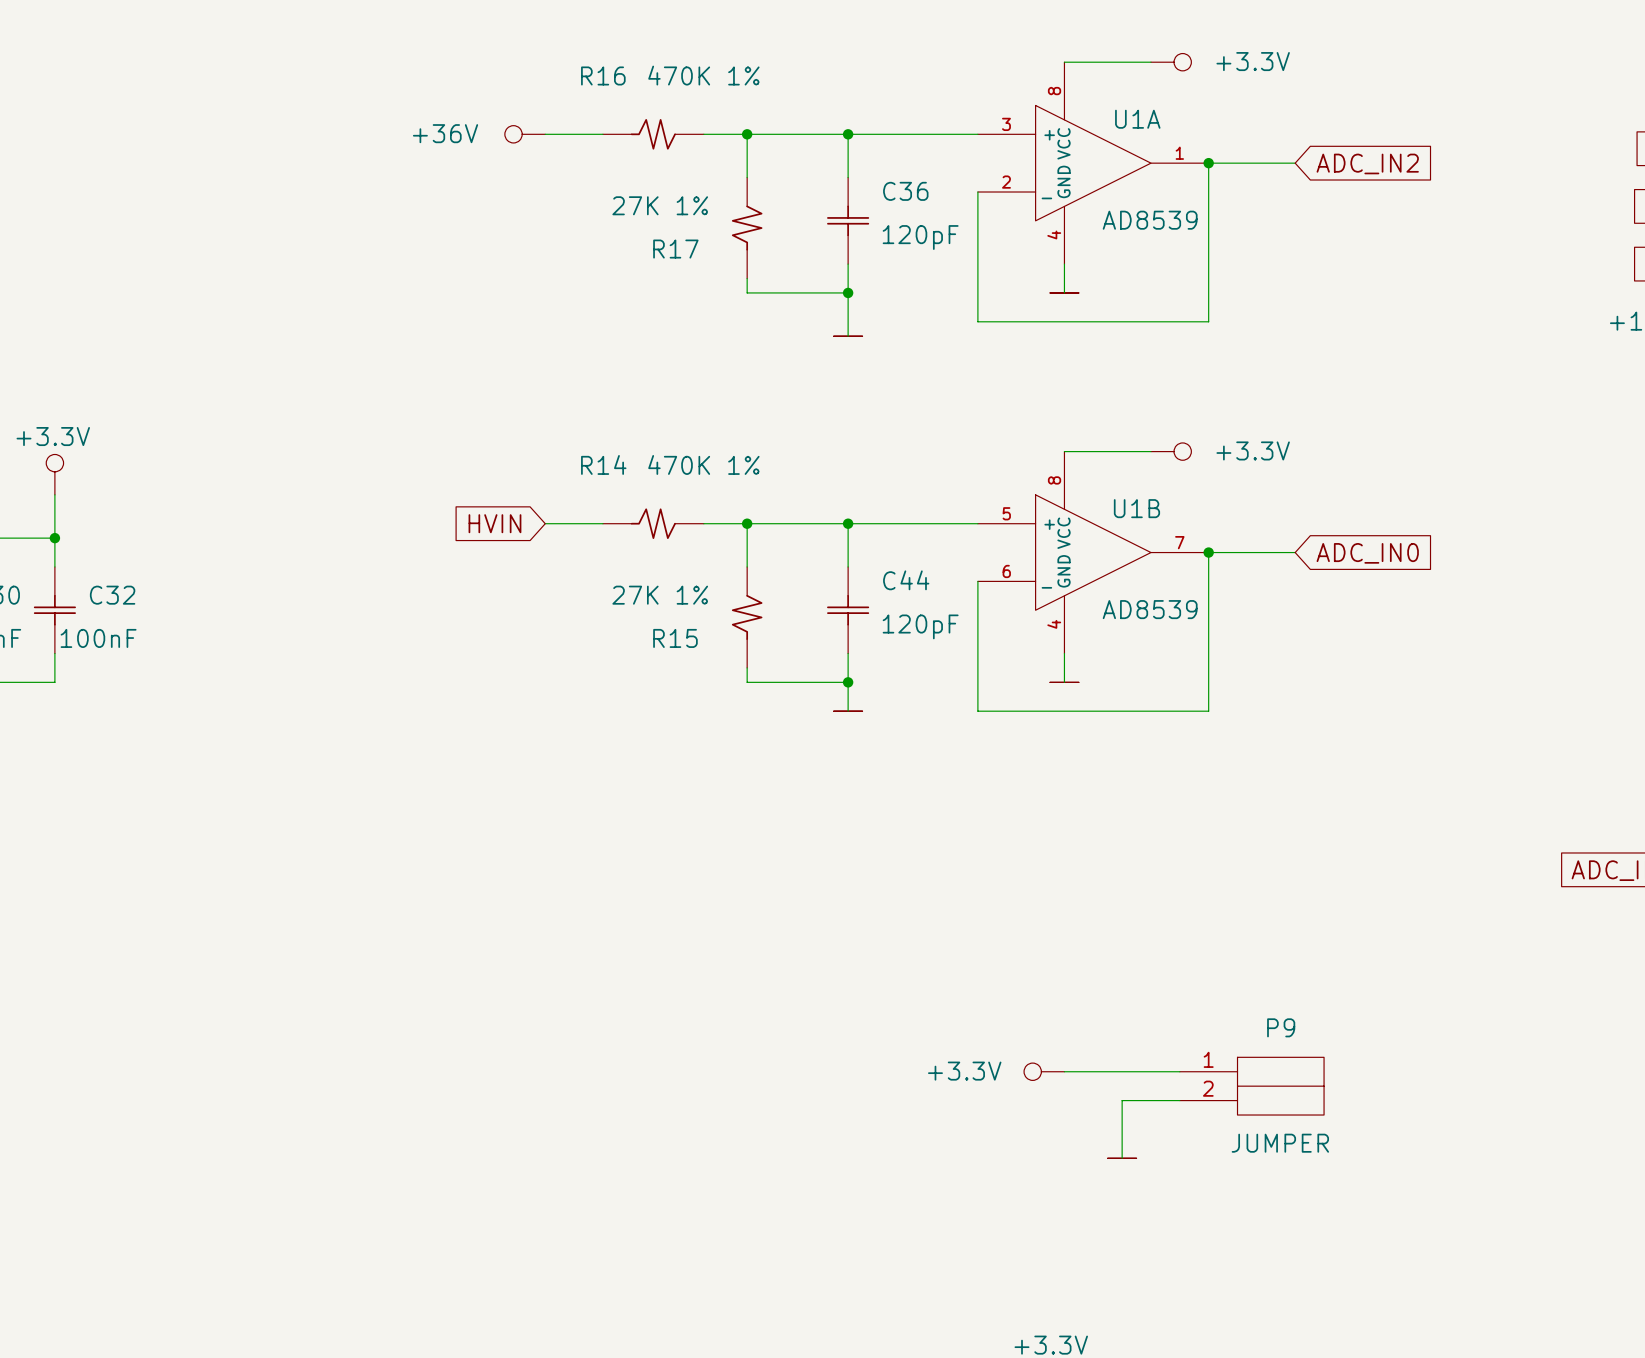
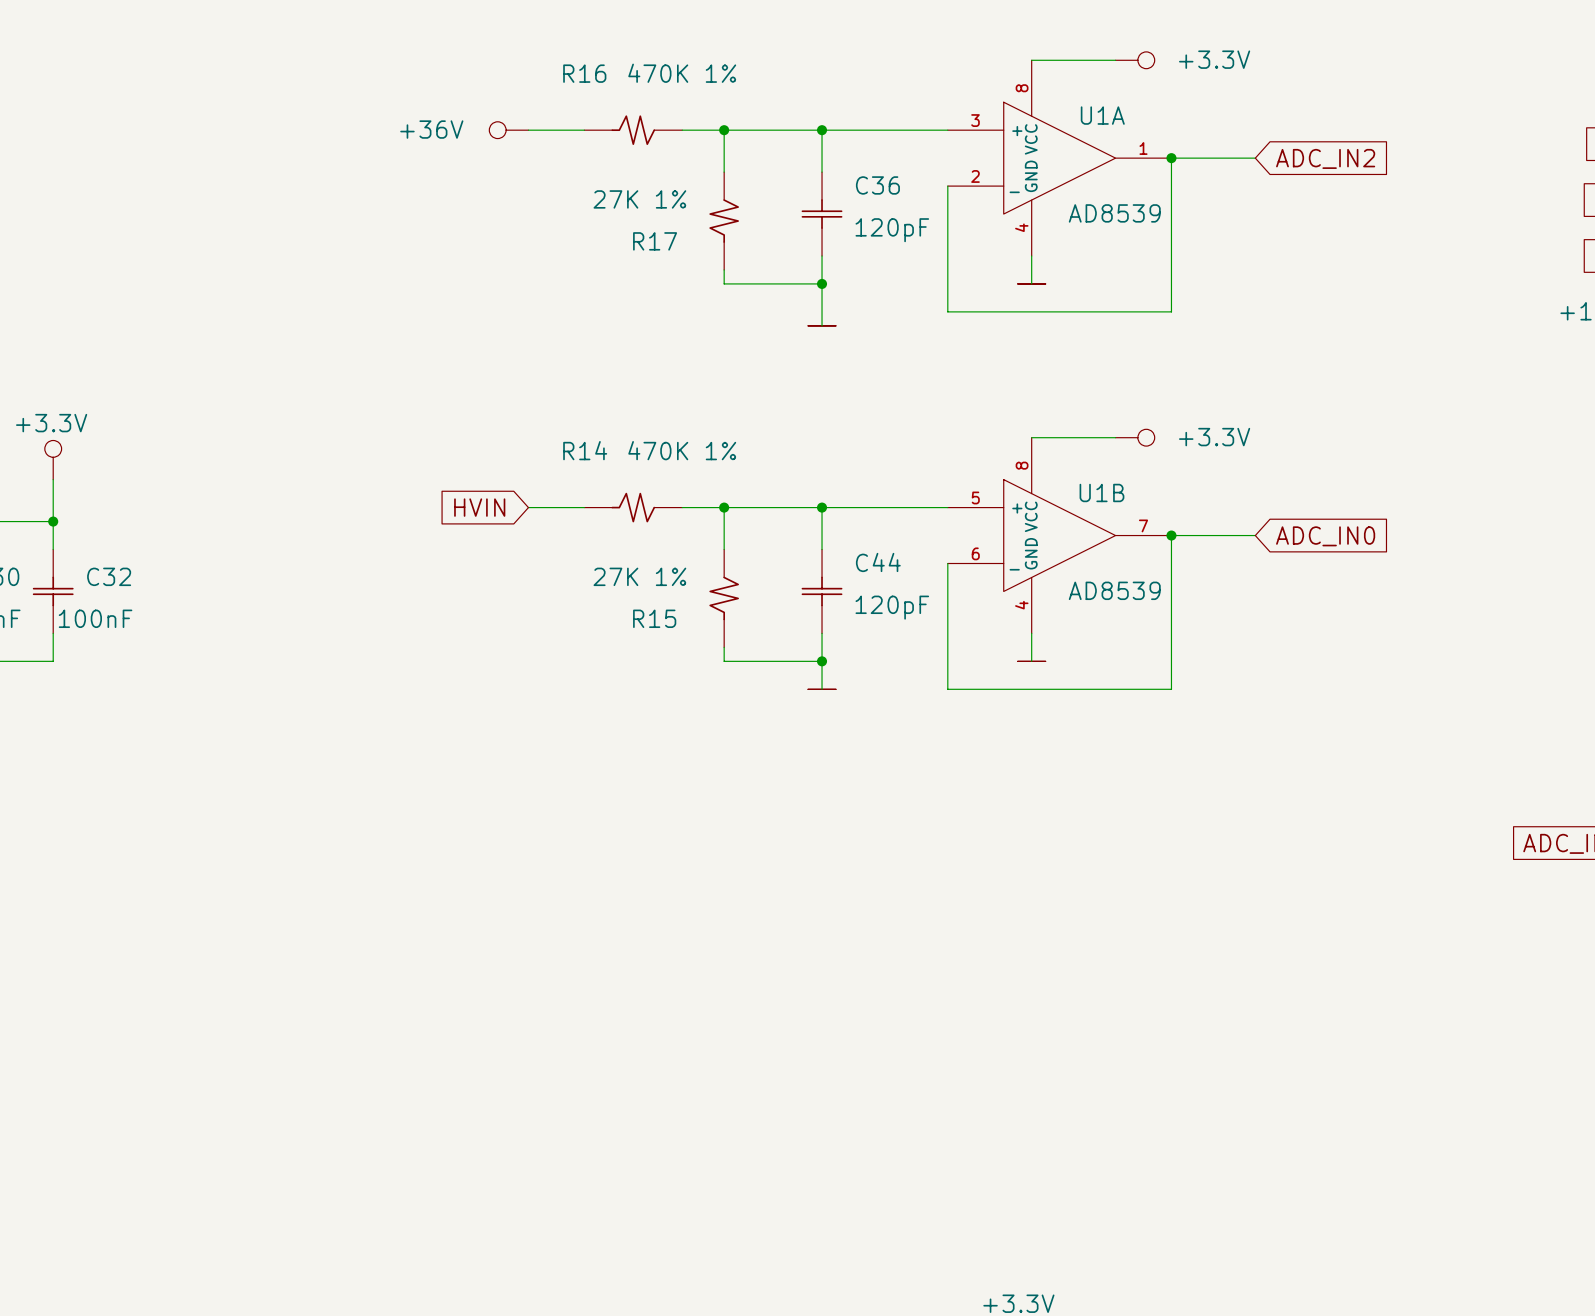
power symbol: +3.3V (1044, 1071) -> none
wire: (1064, 1071) (1179, 1071) -> none
P9: JUMPER (1251, 1086) -> none
wire: (1179, 1100) (1122, 1100) (1122, 1158) -> none
power symbol: (1122, 1158) -> none

